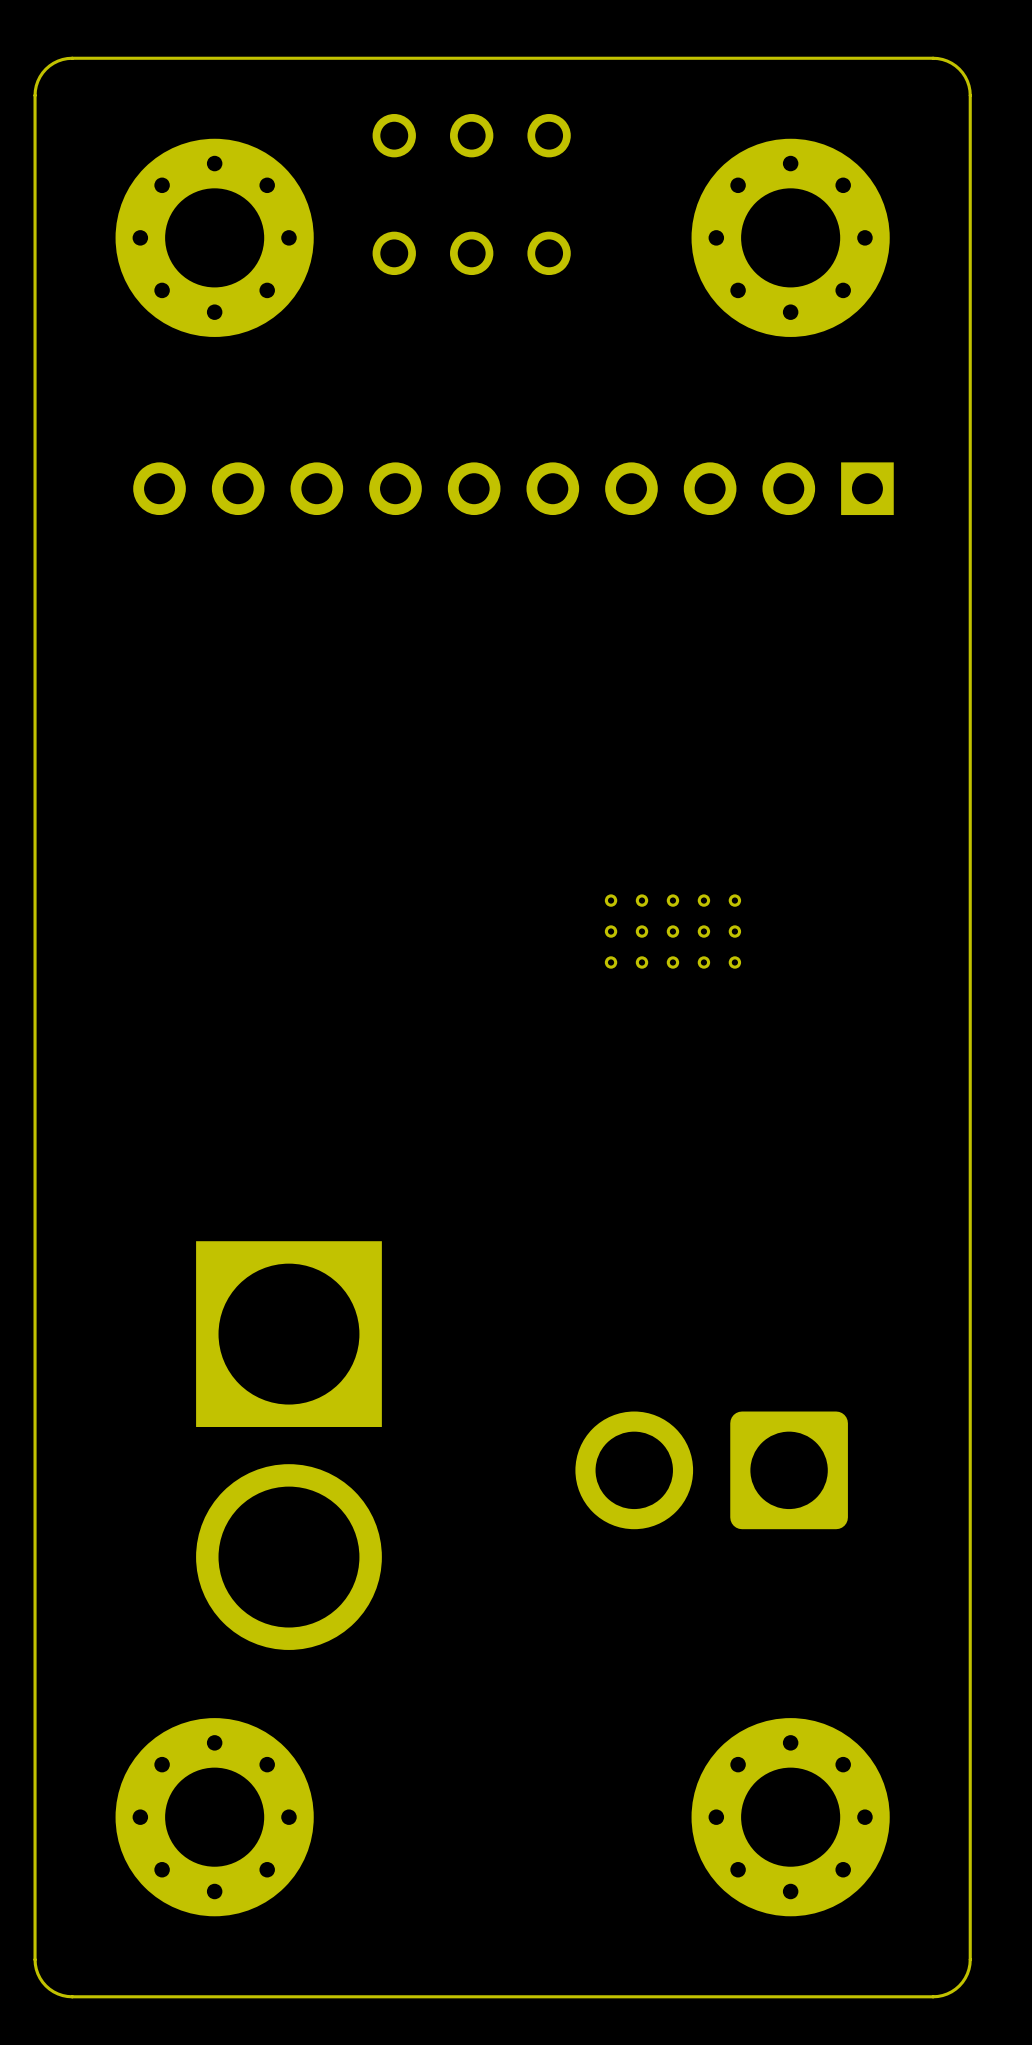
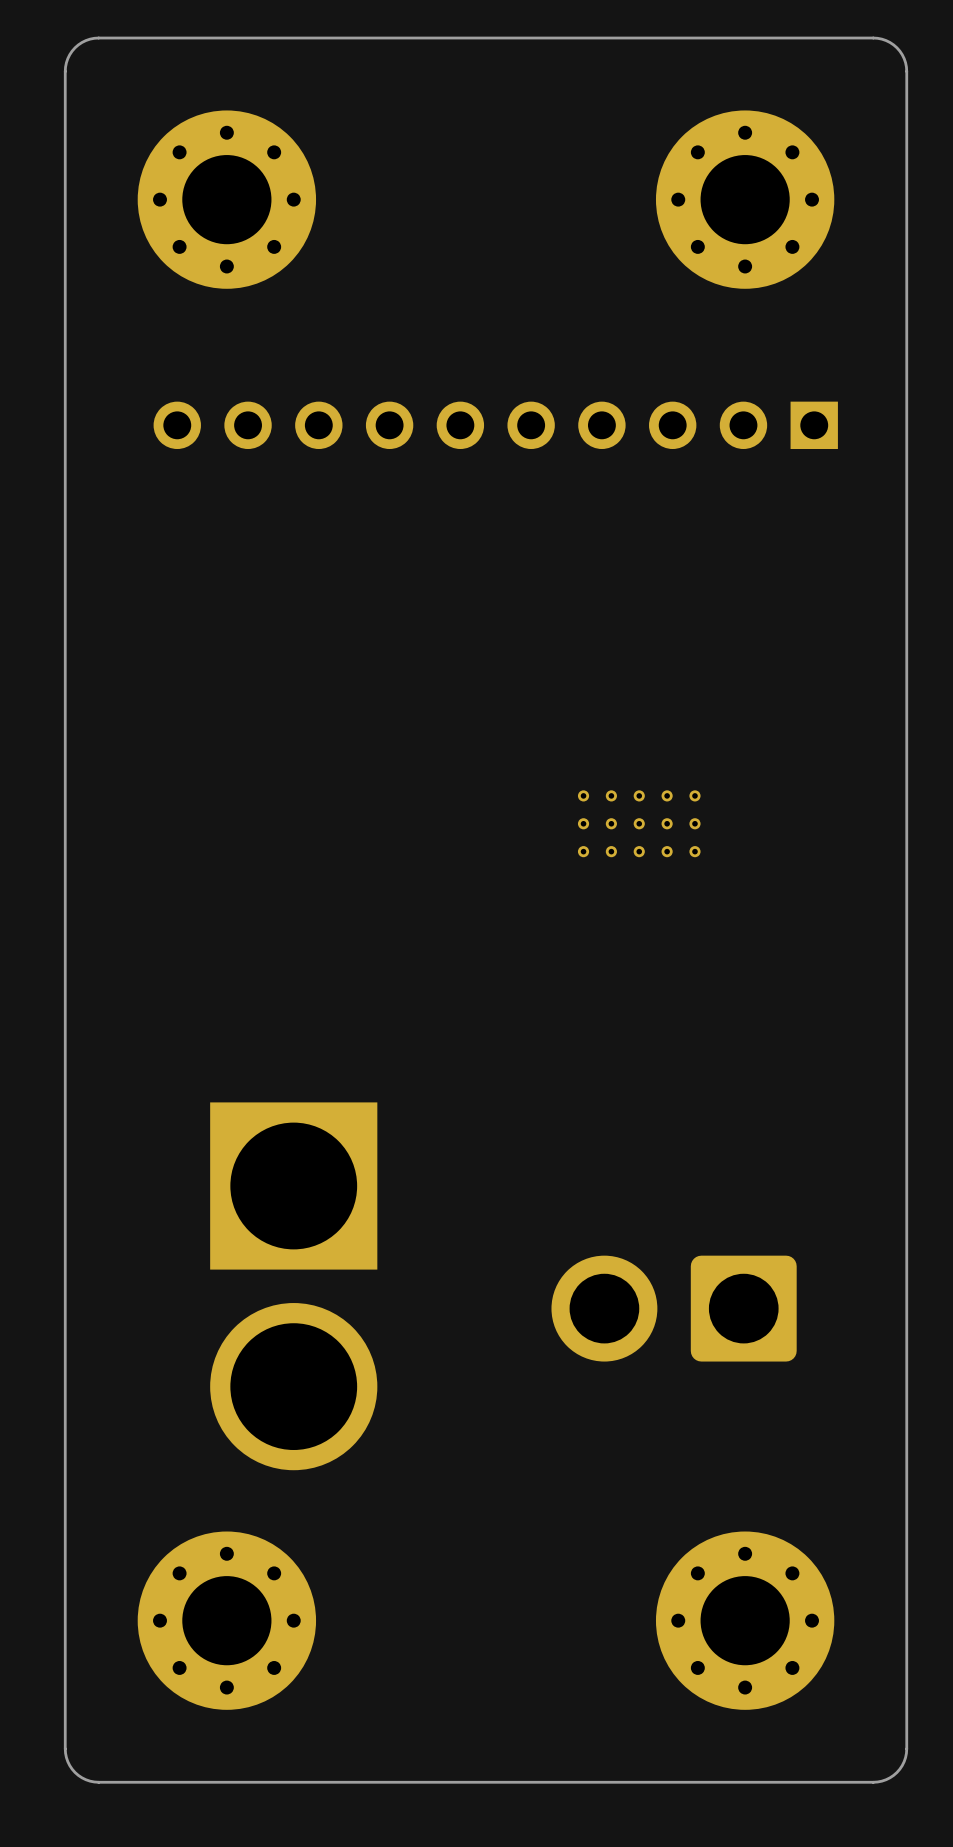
part: (471, 135) -> none
part: (471, 253) -> none

